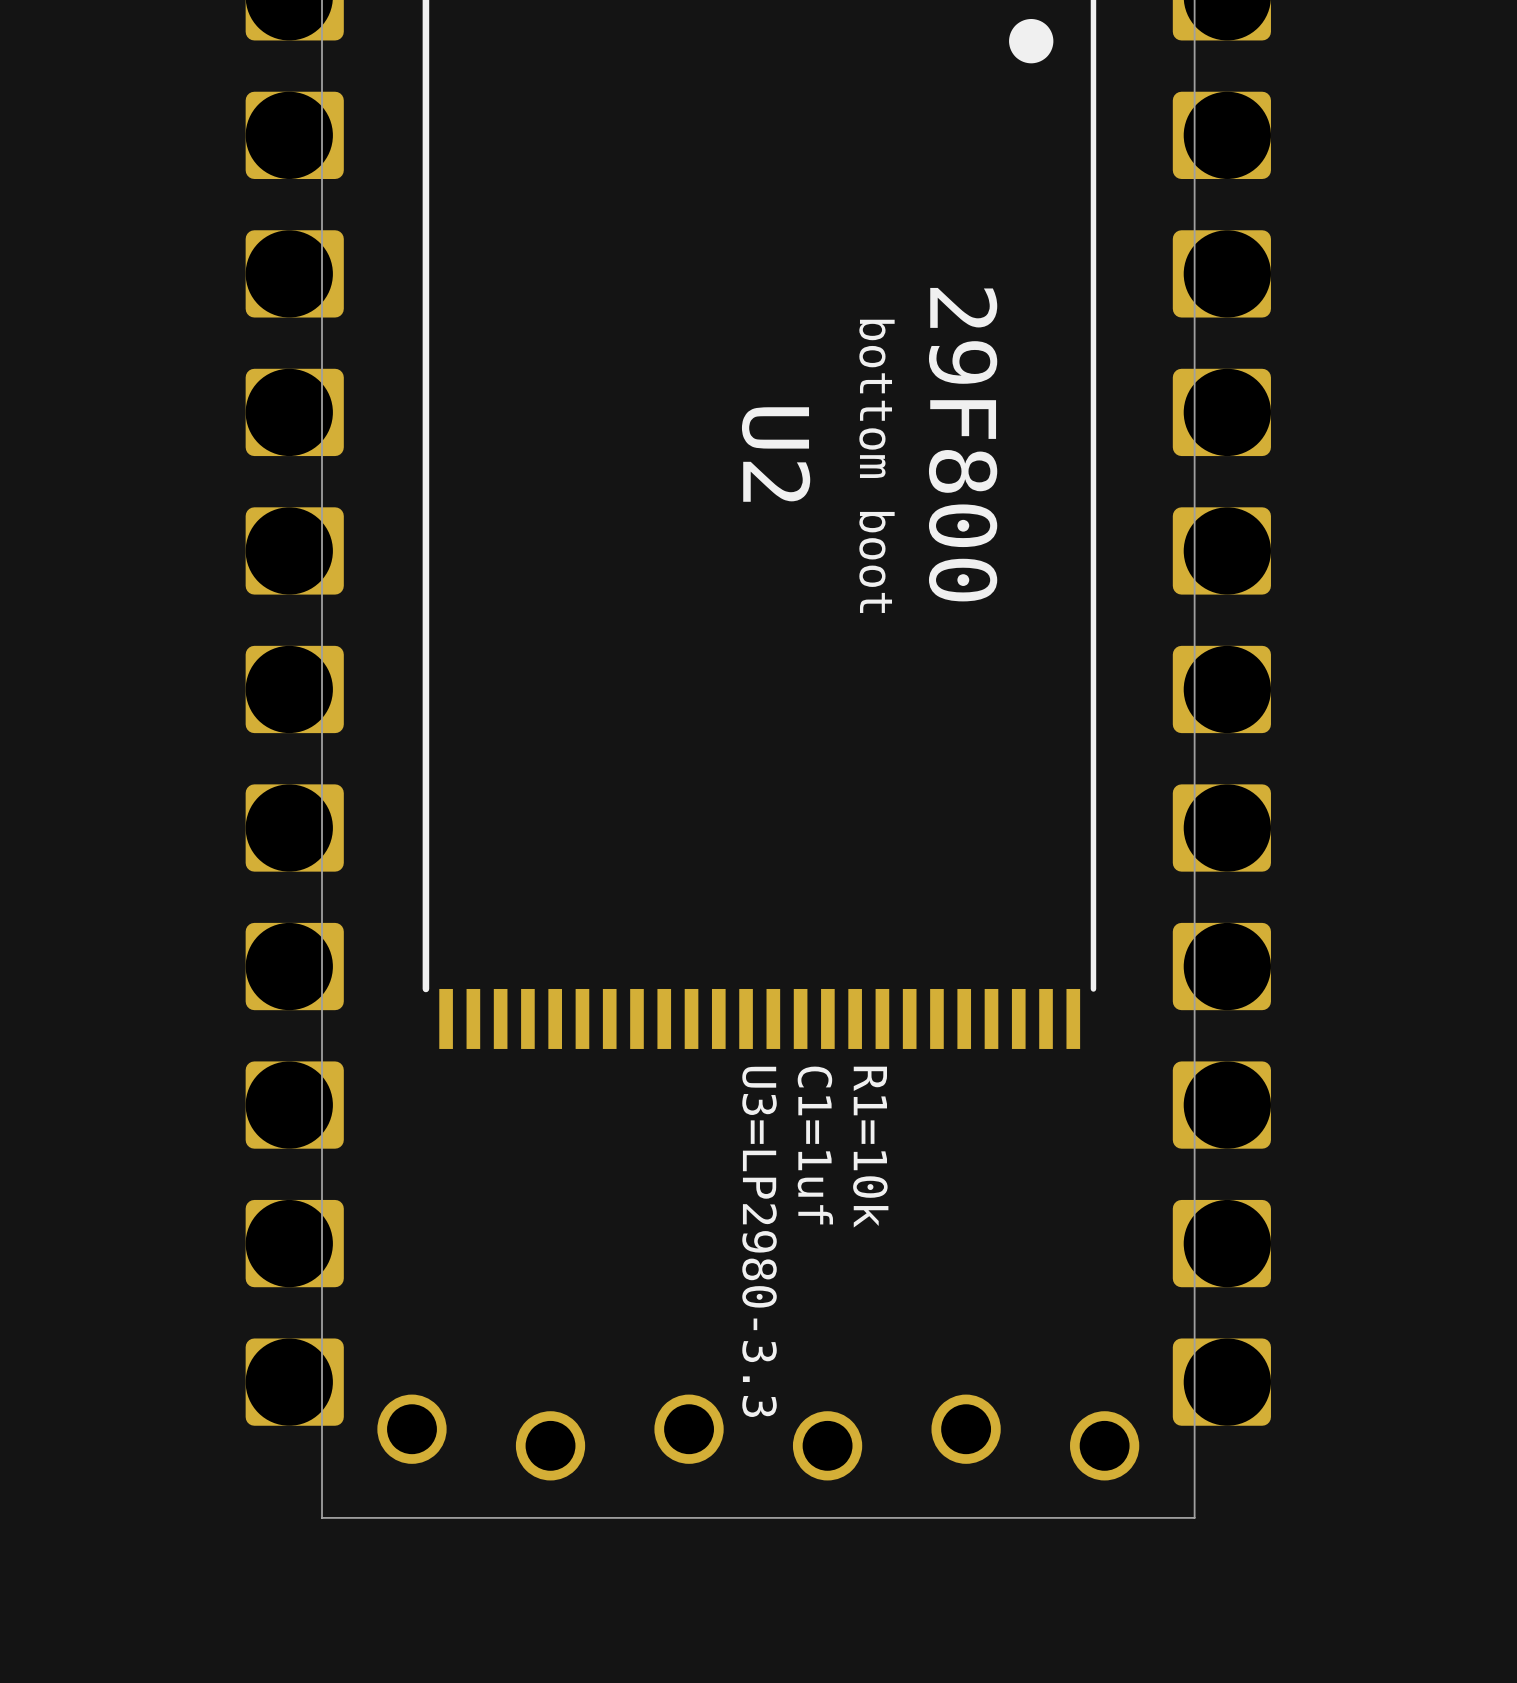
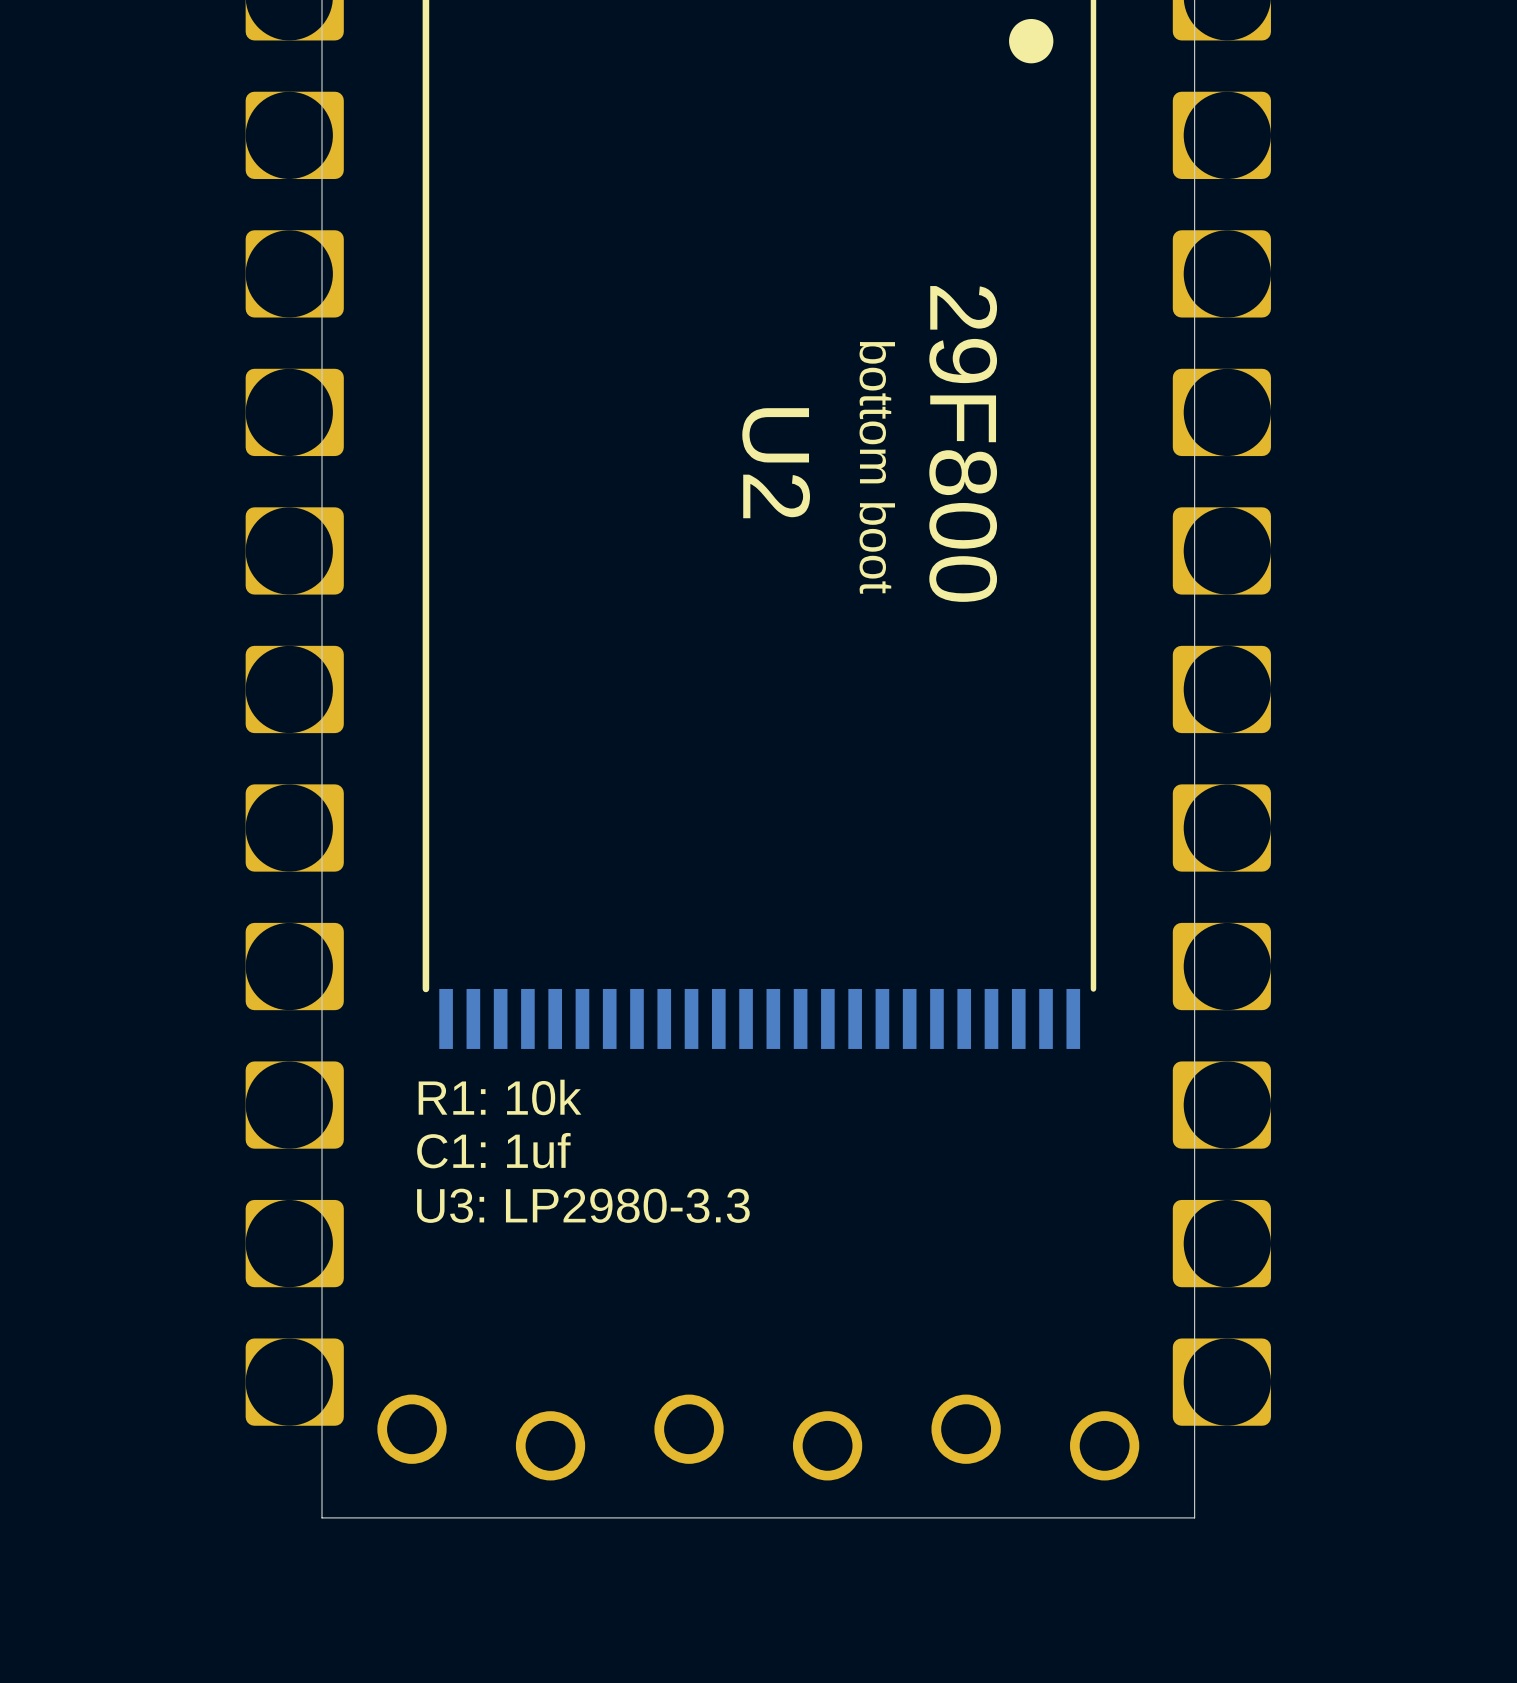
text: none -> R1: 10k (500, 1097)
text: C1=1uf (815, 1145) -> none
text: R1=10k (870, 1147) -> none
text: none -> C1: 1uf (493, 1150)
text: U3=LP2980-3.3 (759, 1241) -> U3: LP2980-3.3 (583, 1205)

